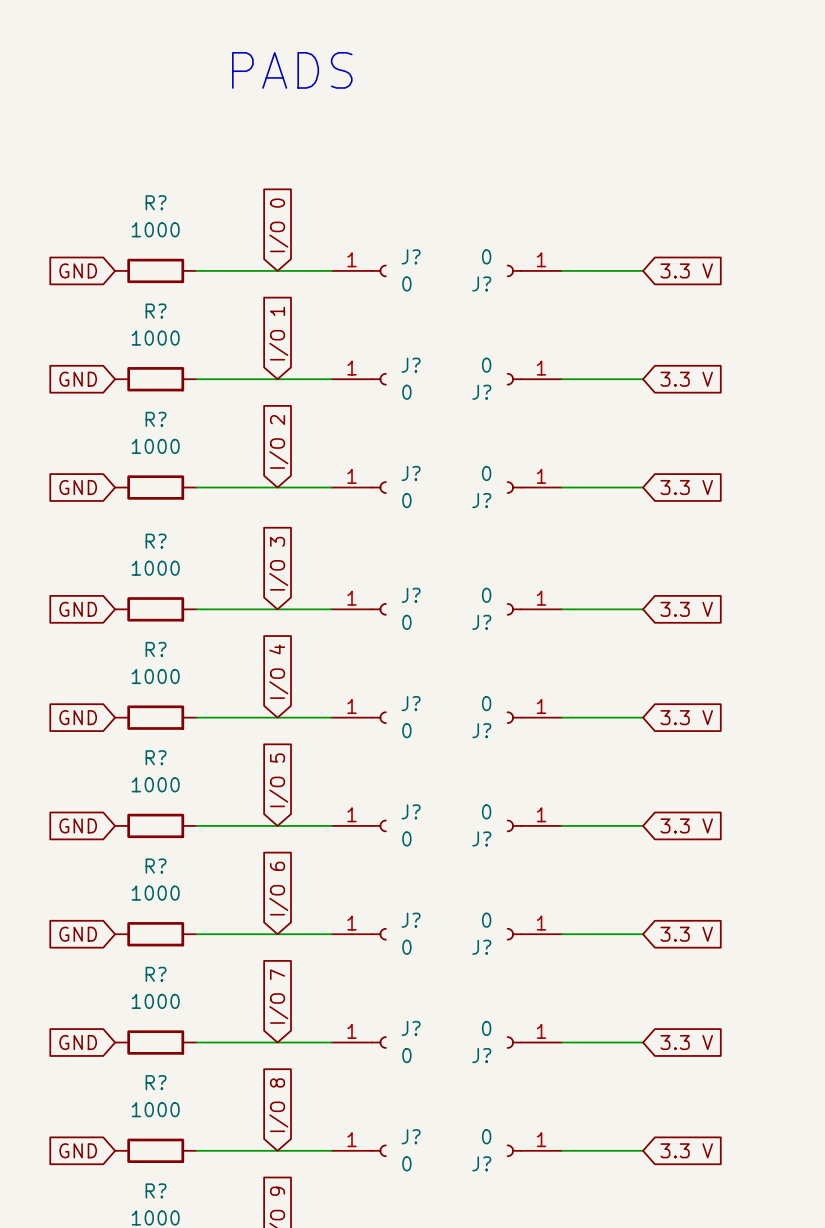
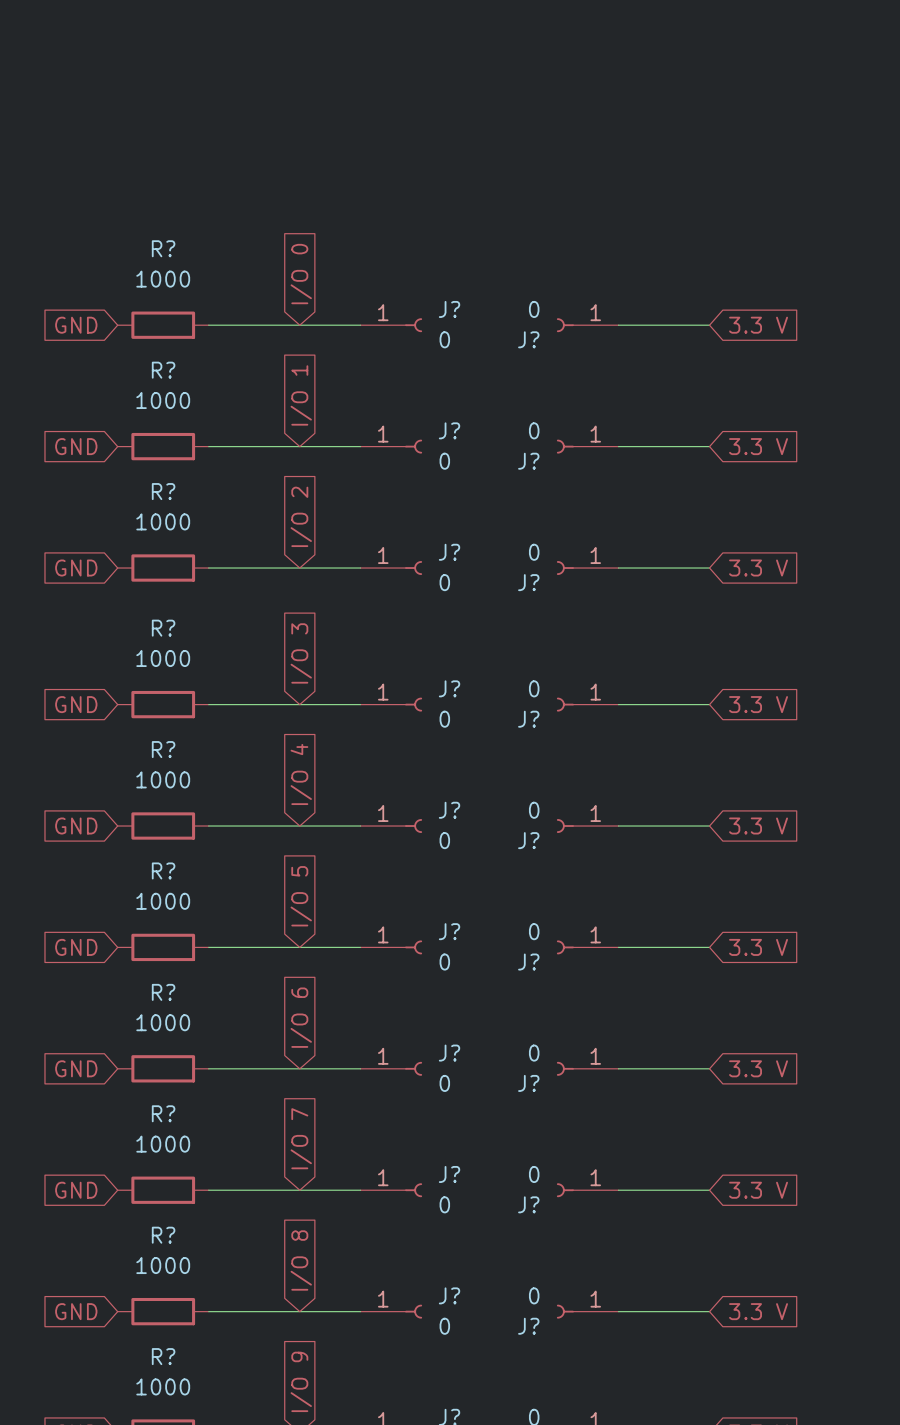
text: PADS (292, 70) -> none

